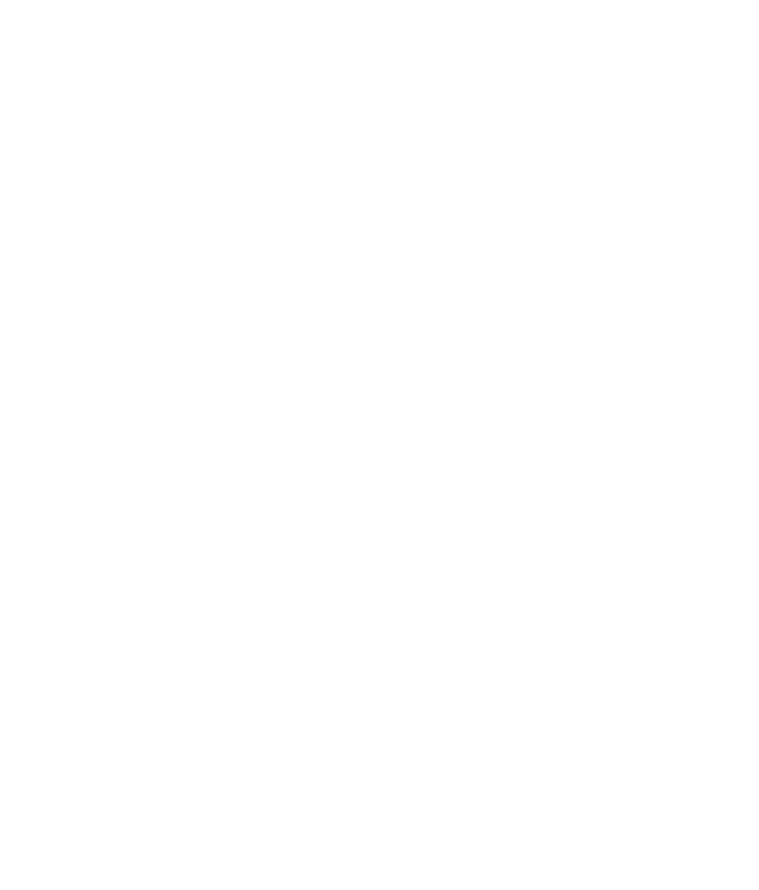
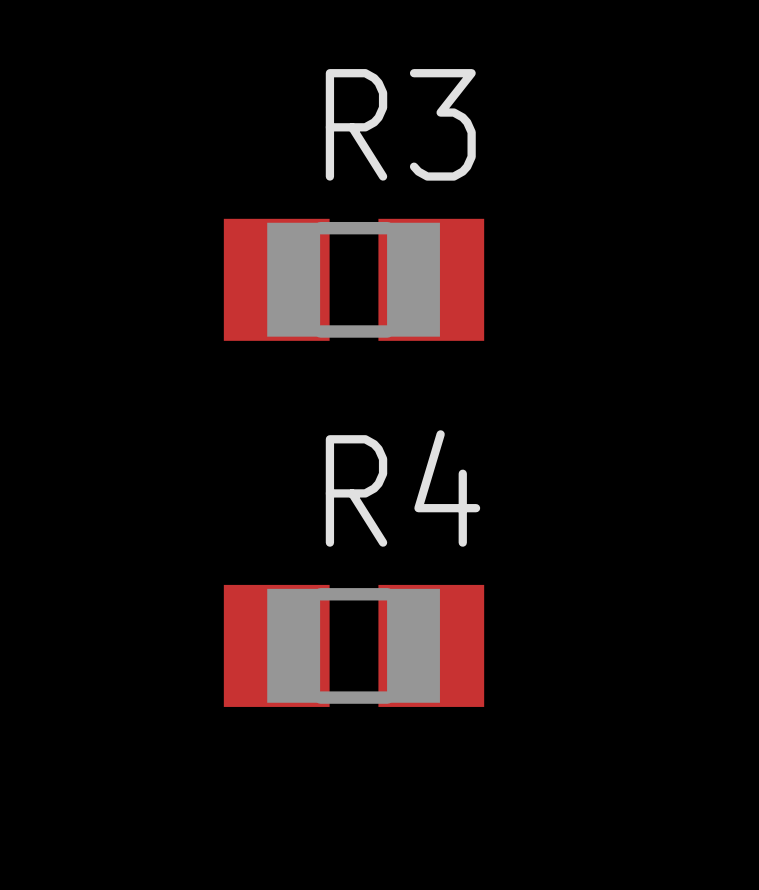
R3: none -> (354, 279)
R4: none -> (354, 645)

